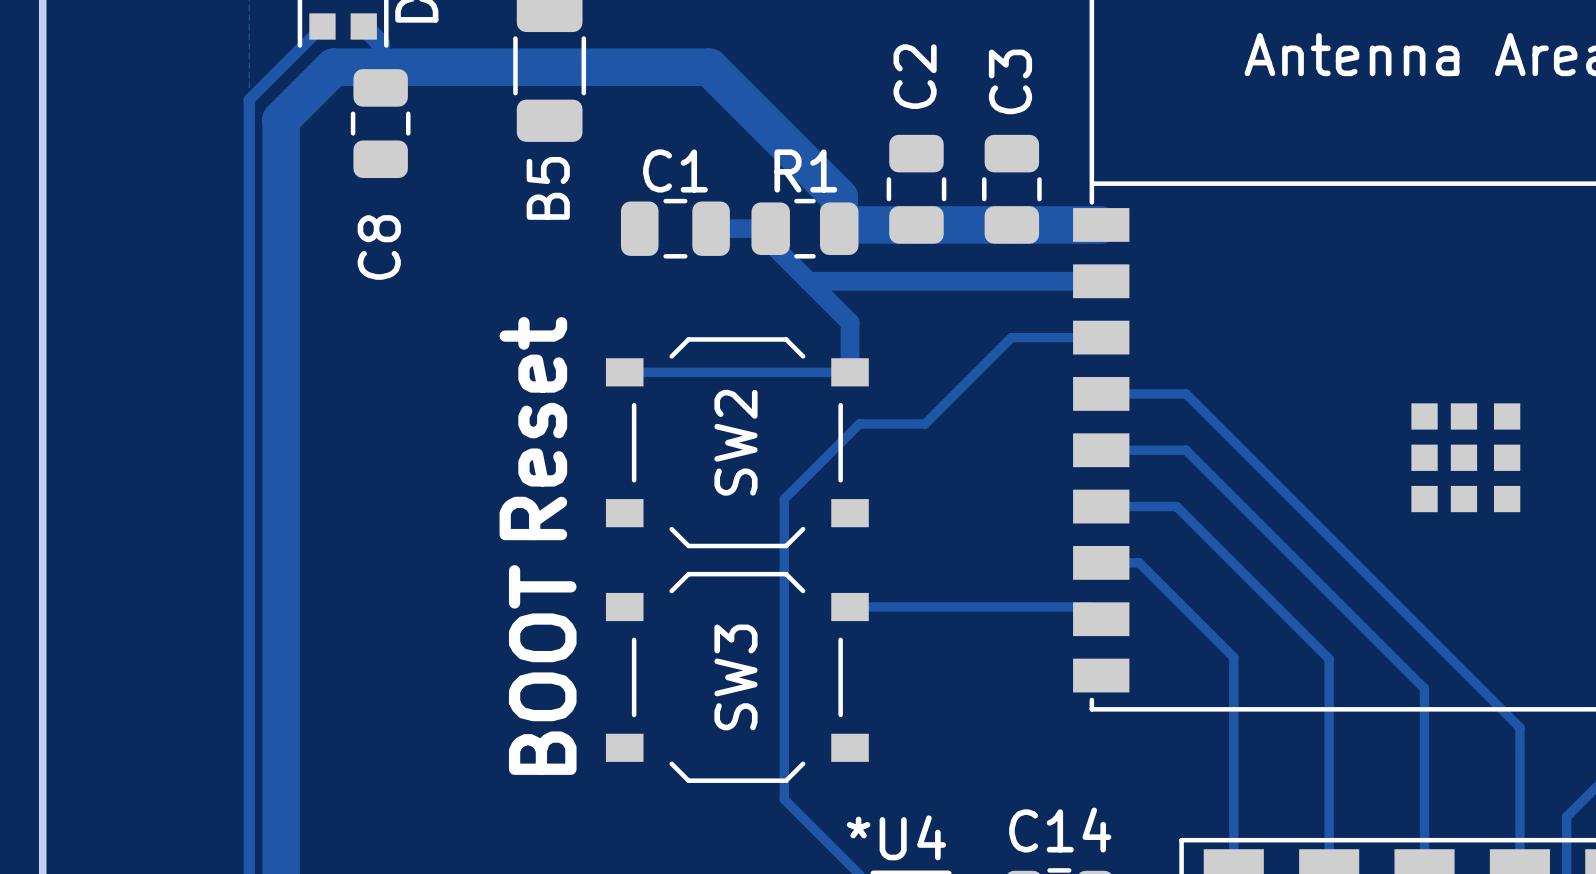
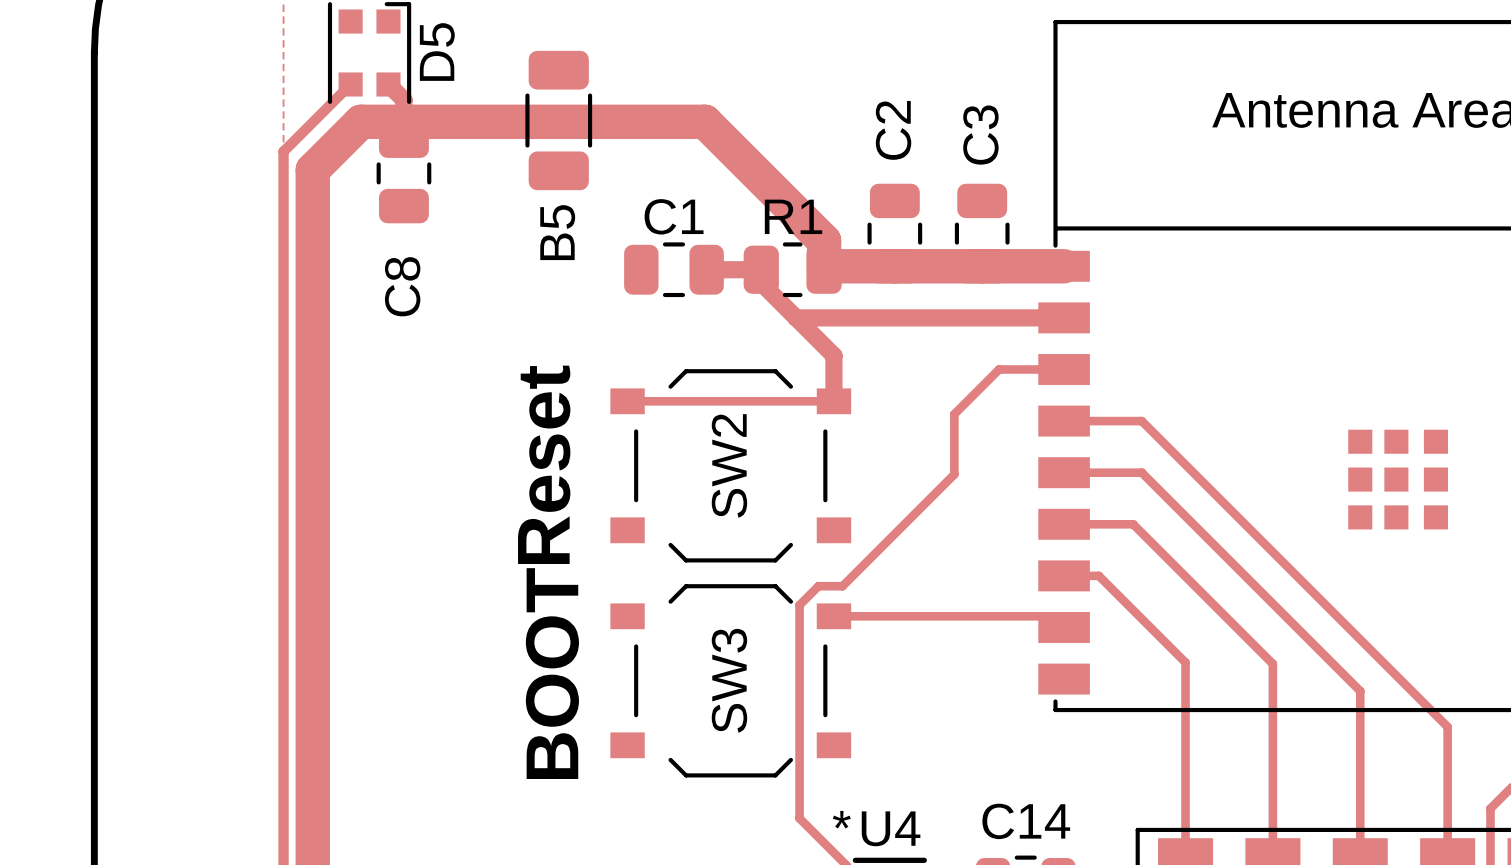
track: (1030, 337) (1011, 337) (925, 423) (859, 423) (784, 499) (784, 799) (812, 827) -> (999, 369) (954, 414) (954, 474) (842, 586) (818, 586) (799, 605) (799, 818)

